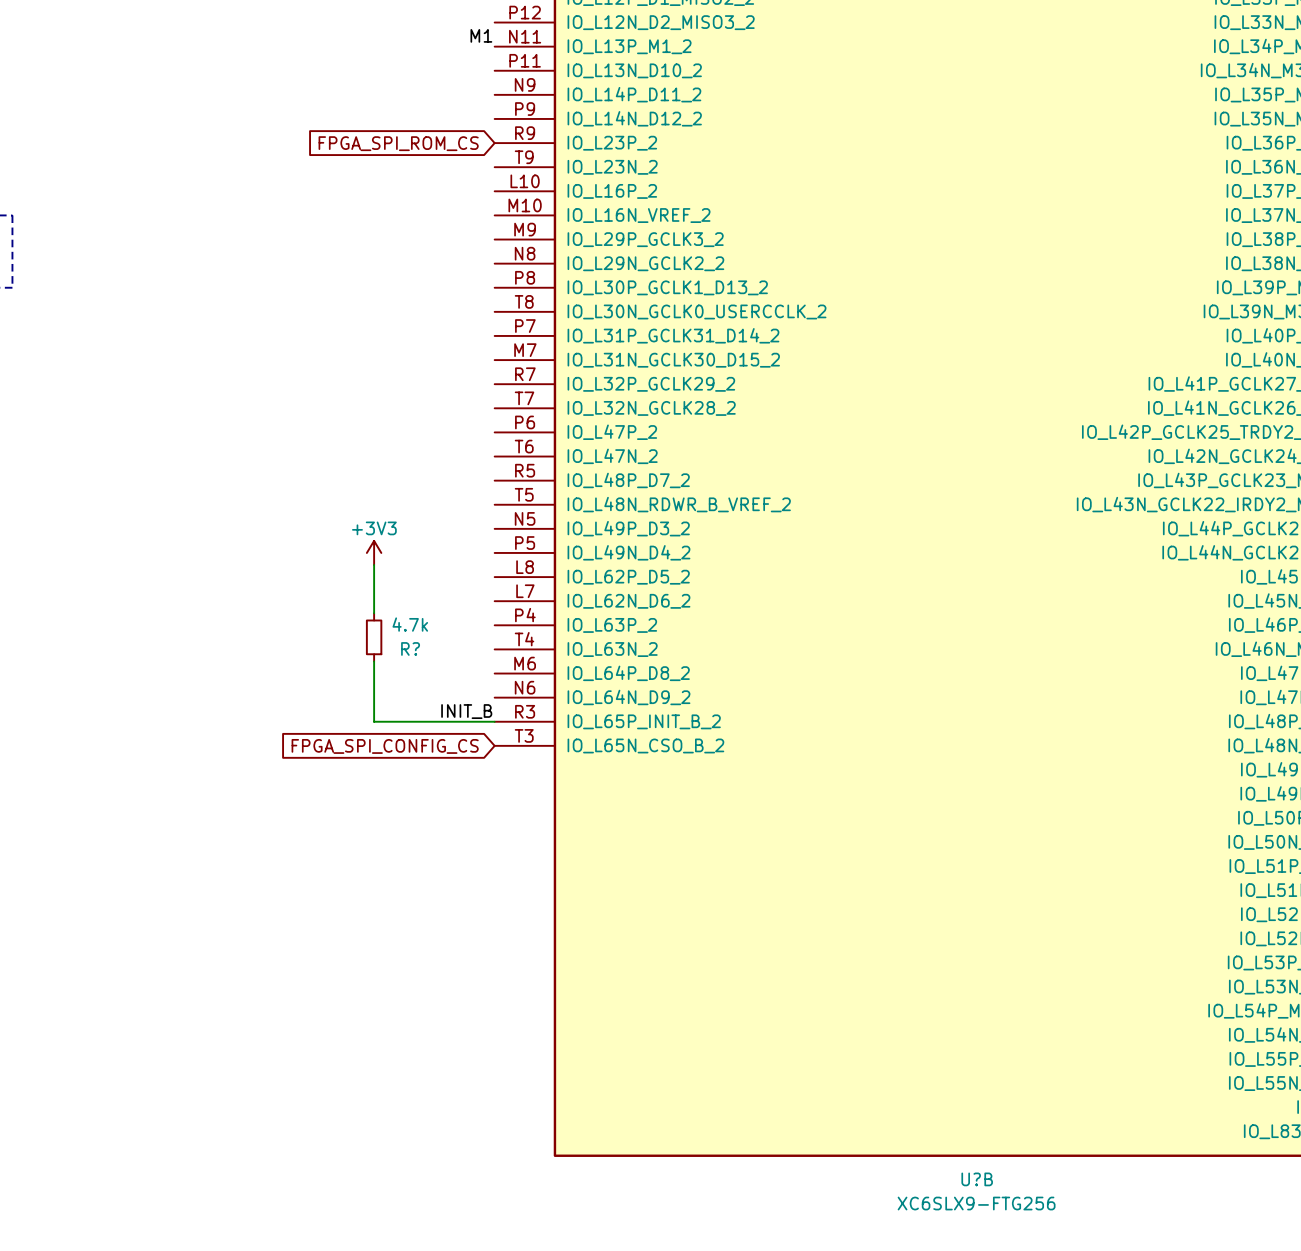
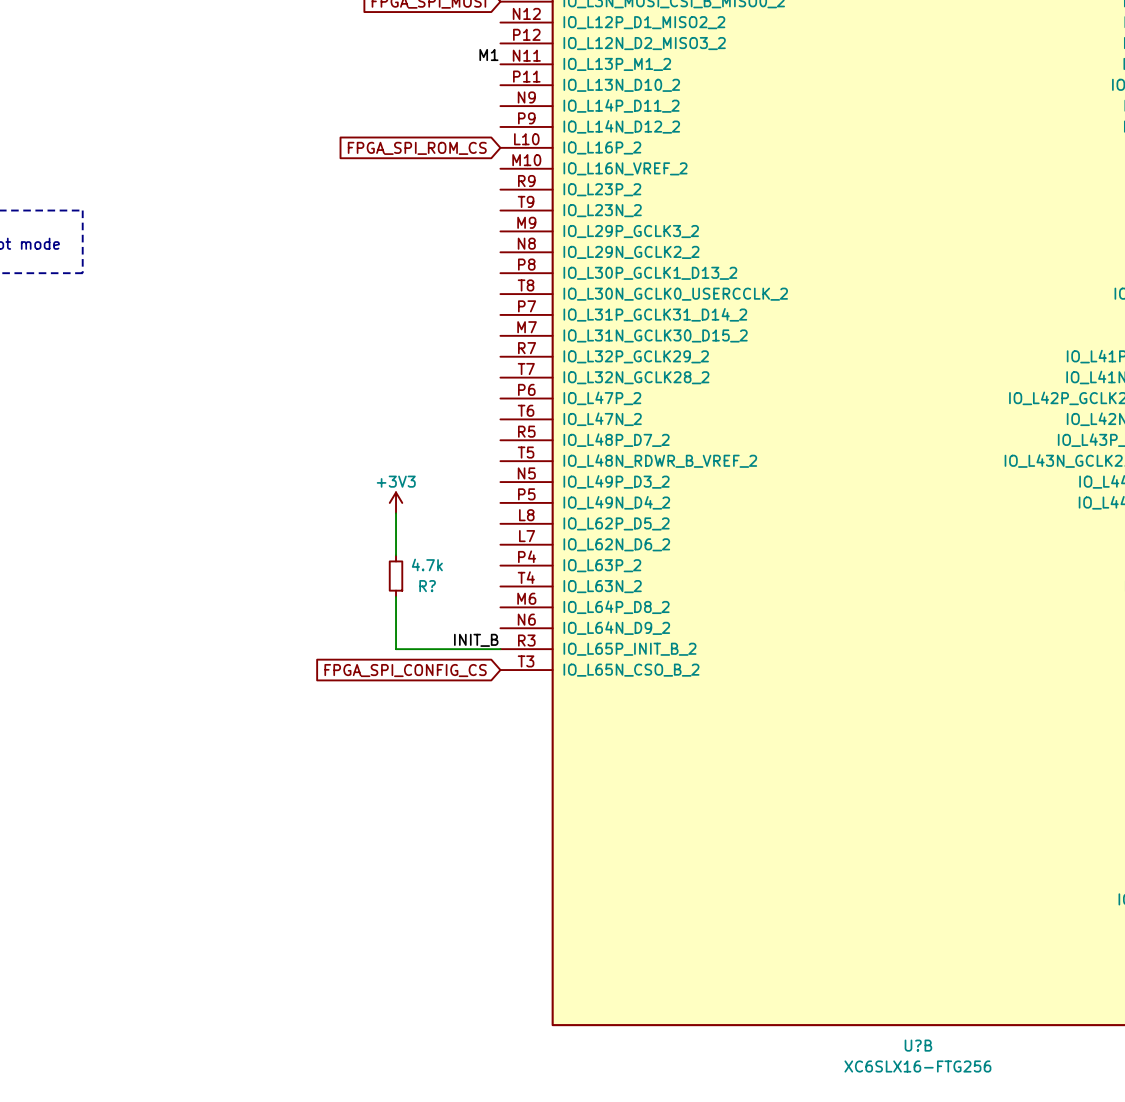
U?B pin number: R9 (525, 133) -> L10 (526, 139)
U?B pin name: IO_L23P_2 (612, 143) -> IO_L16P_2 (602, 147)
U?B pin number: T9 (524, 157) -> M10 (526, 160)
U?B pin name: IO_L23N_2 (612, 167) -> IO_L16N_VREF_2 (625, 168)
U?B pin number: L10 (525, 181) -> R9 (526, 181)
U?B pin name: IO_L16P_2 (612, 191) -> IO_L23P_2 (602, 189)
U?B pin number: M10 (525, 205) -> T9 (526, 201)
U?B pin name: IO_L16N_VREF_2 (639, 215) -> IO_L23N_2 (602, 210)
U?B value: XC6SLX9-FTG256 (976, 1203) -> XC6SLX16-FTG256 (917, 1066)

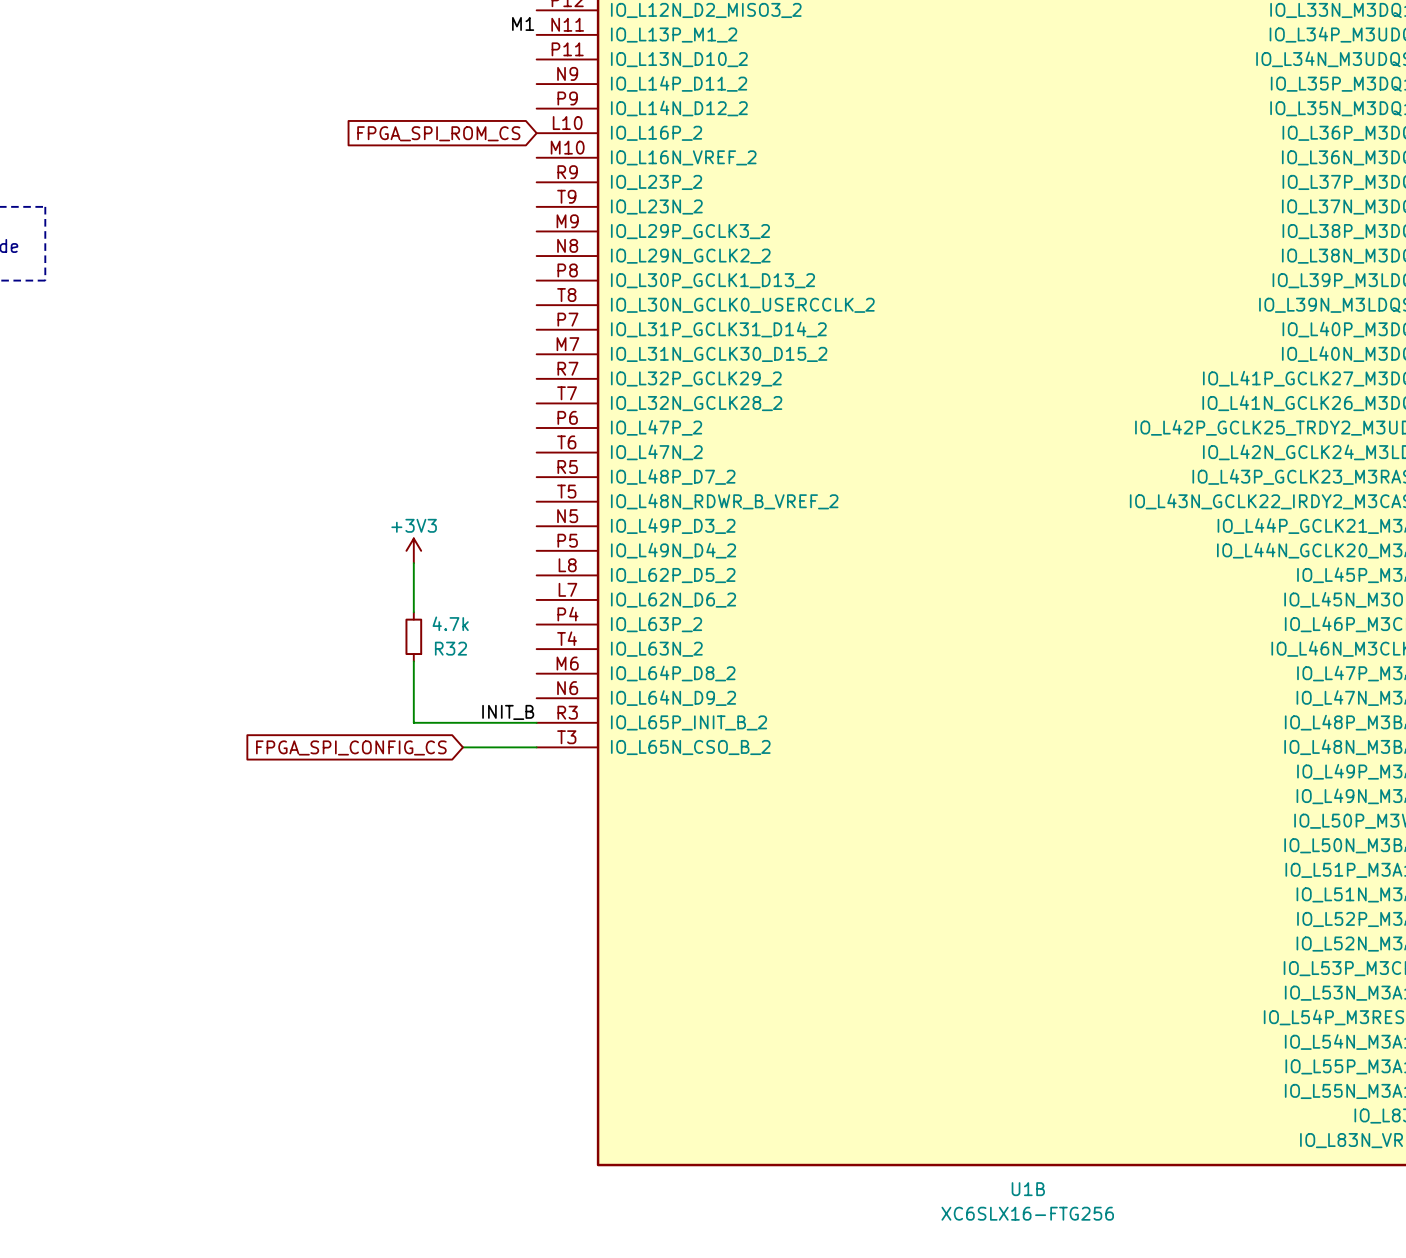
R? name: R? (427, 586) -> R32 (450, 648)
global label position: FPGA_SPI_CONFIG_CS (405, 670) -> FPGA_SPI_CONFIG_CS (351, 747)
wire: none -> (462, 747) (536, 747)
U?B name: U?B (918, 1045) -> U1B (1028, 1189)

